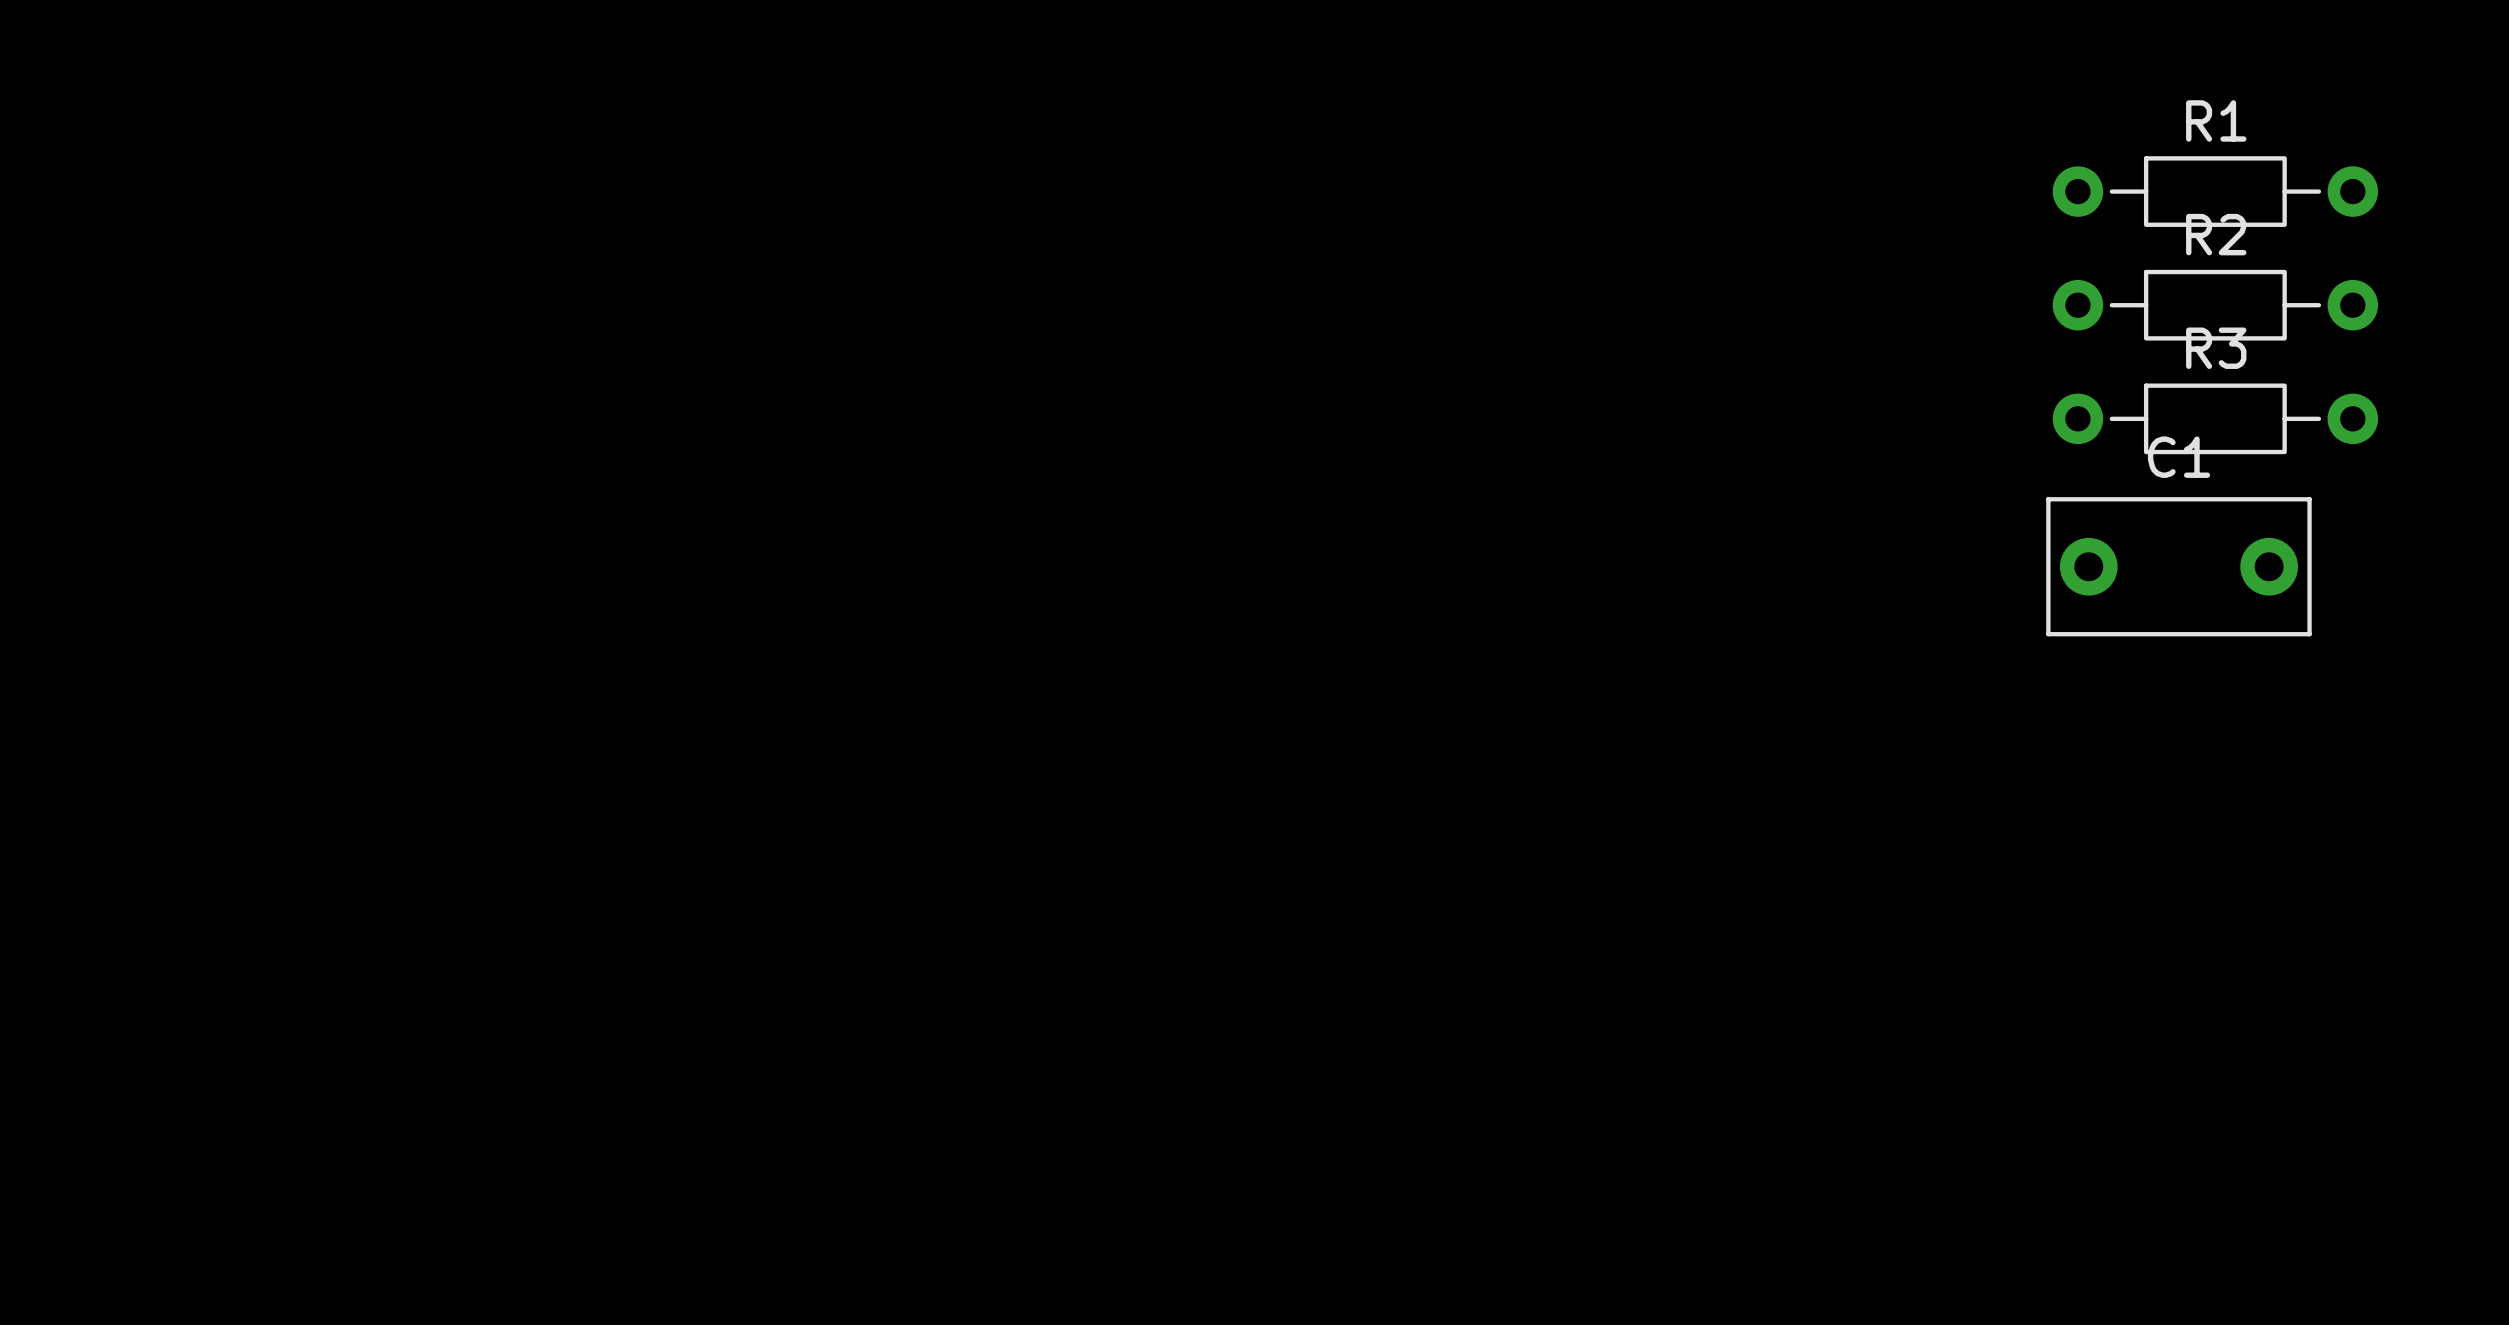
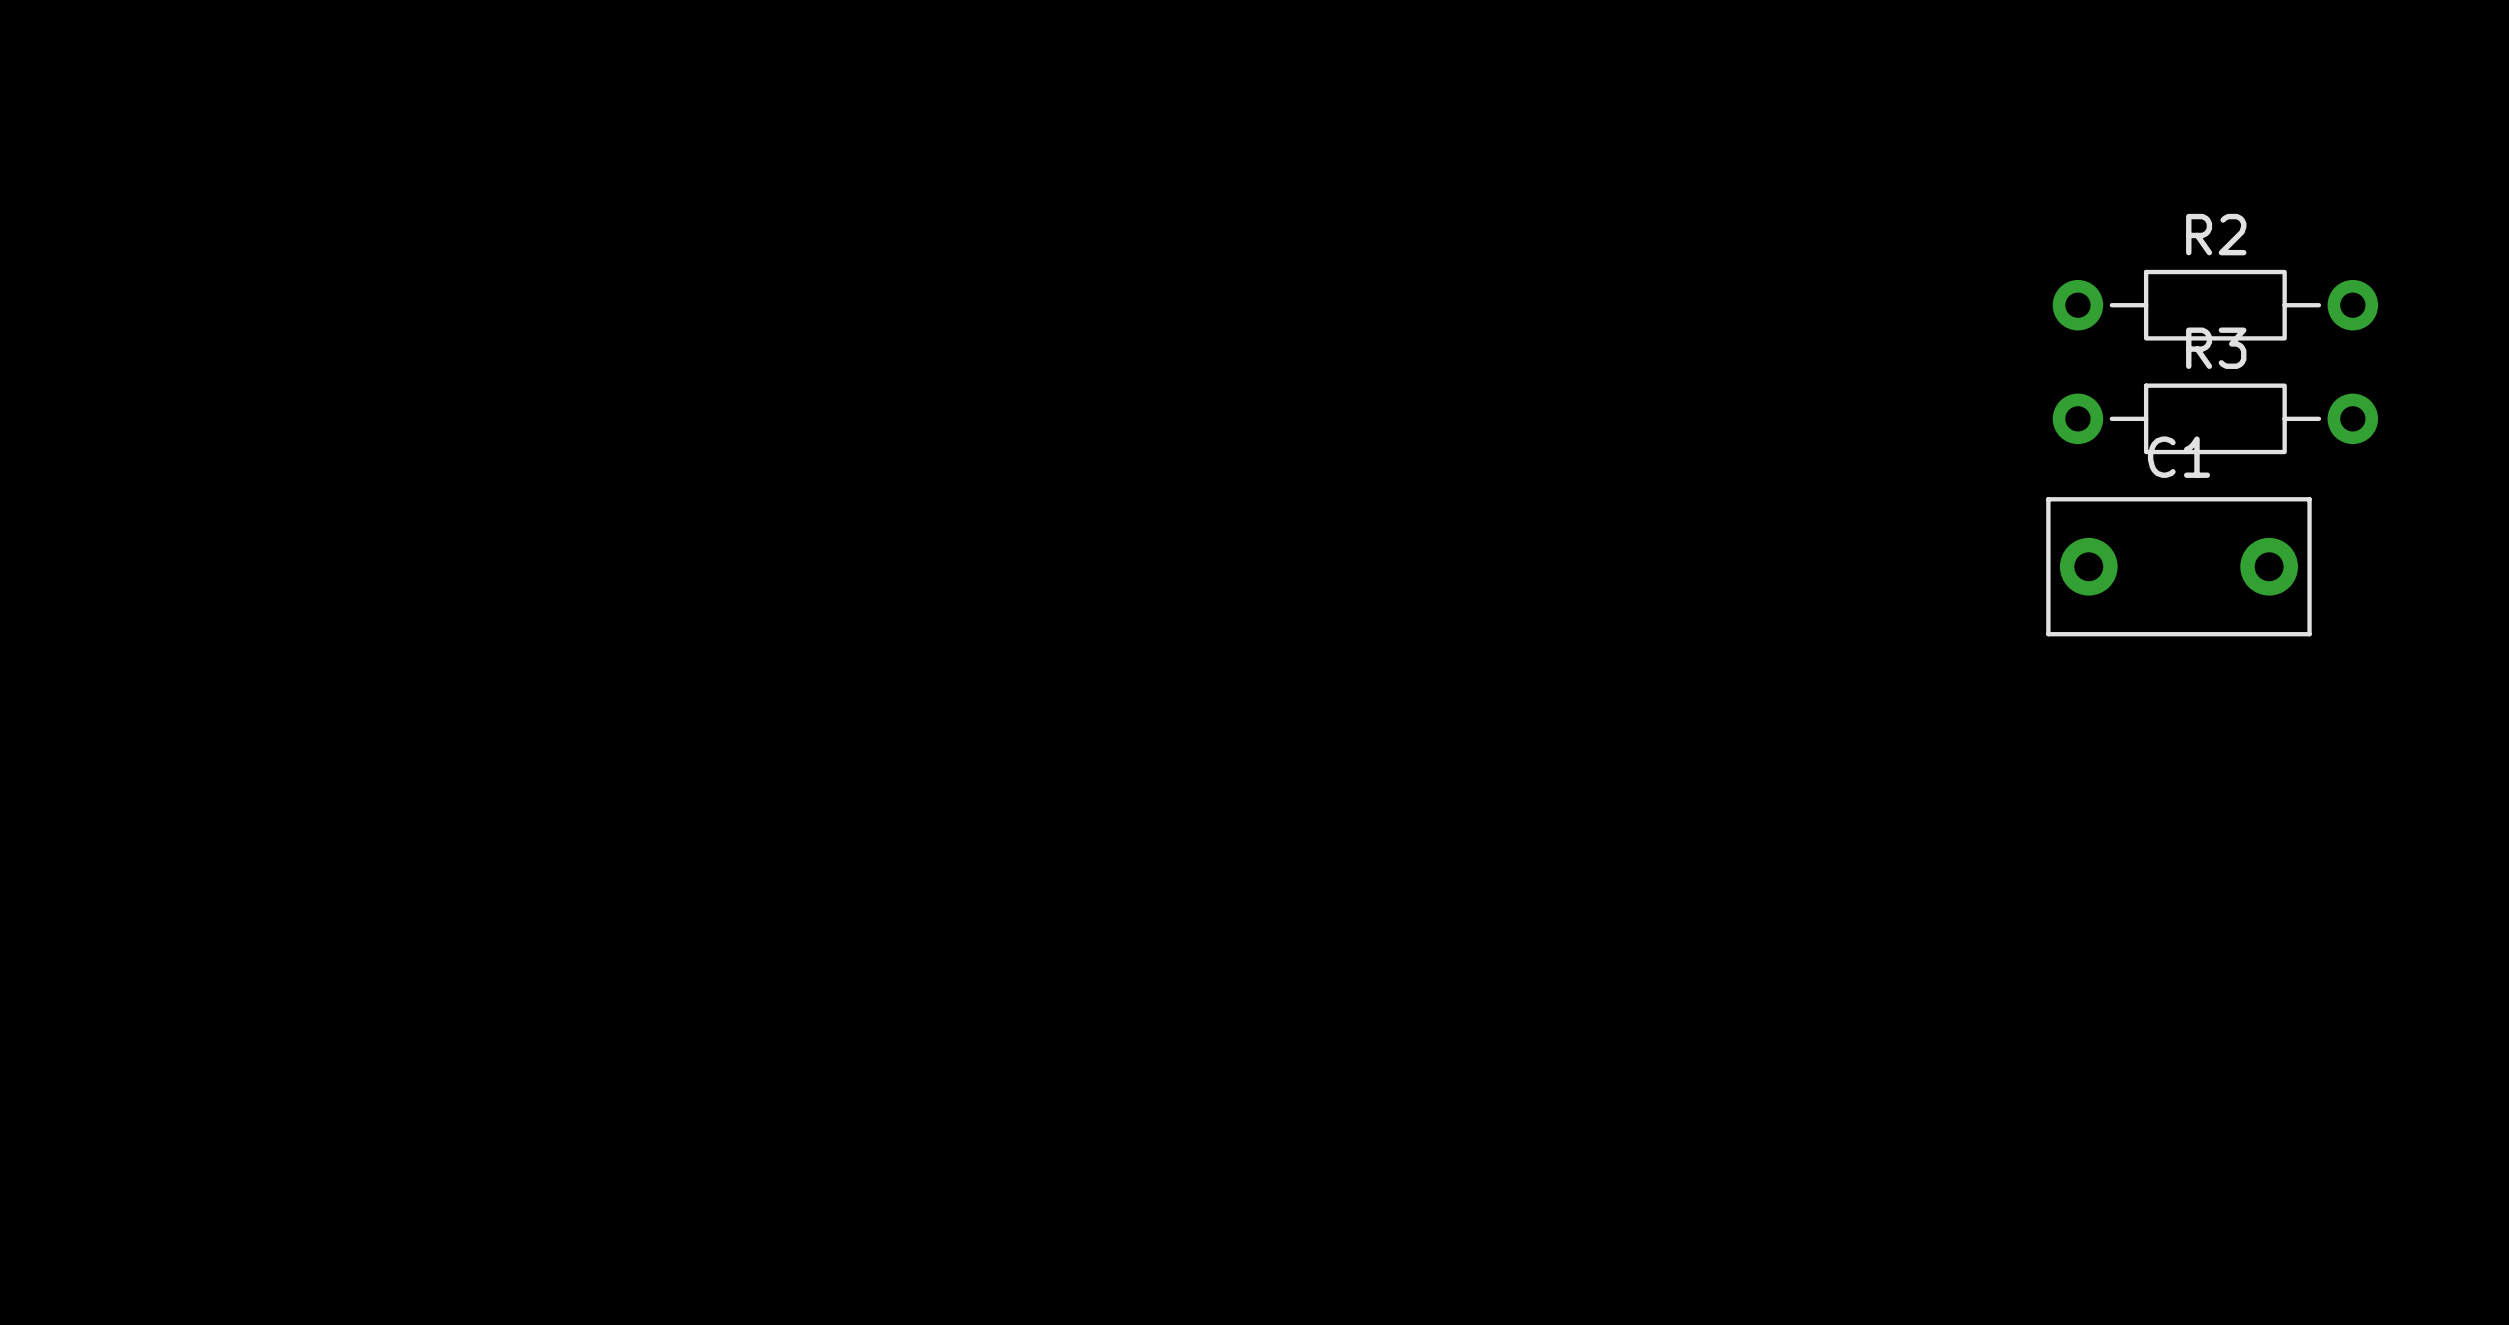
R1: (2215, 191) -> none

